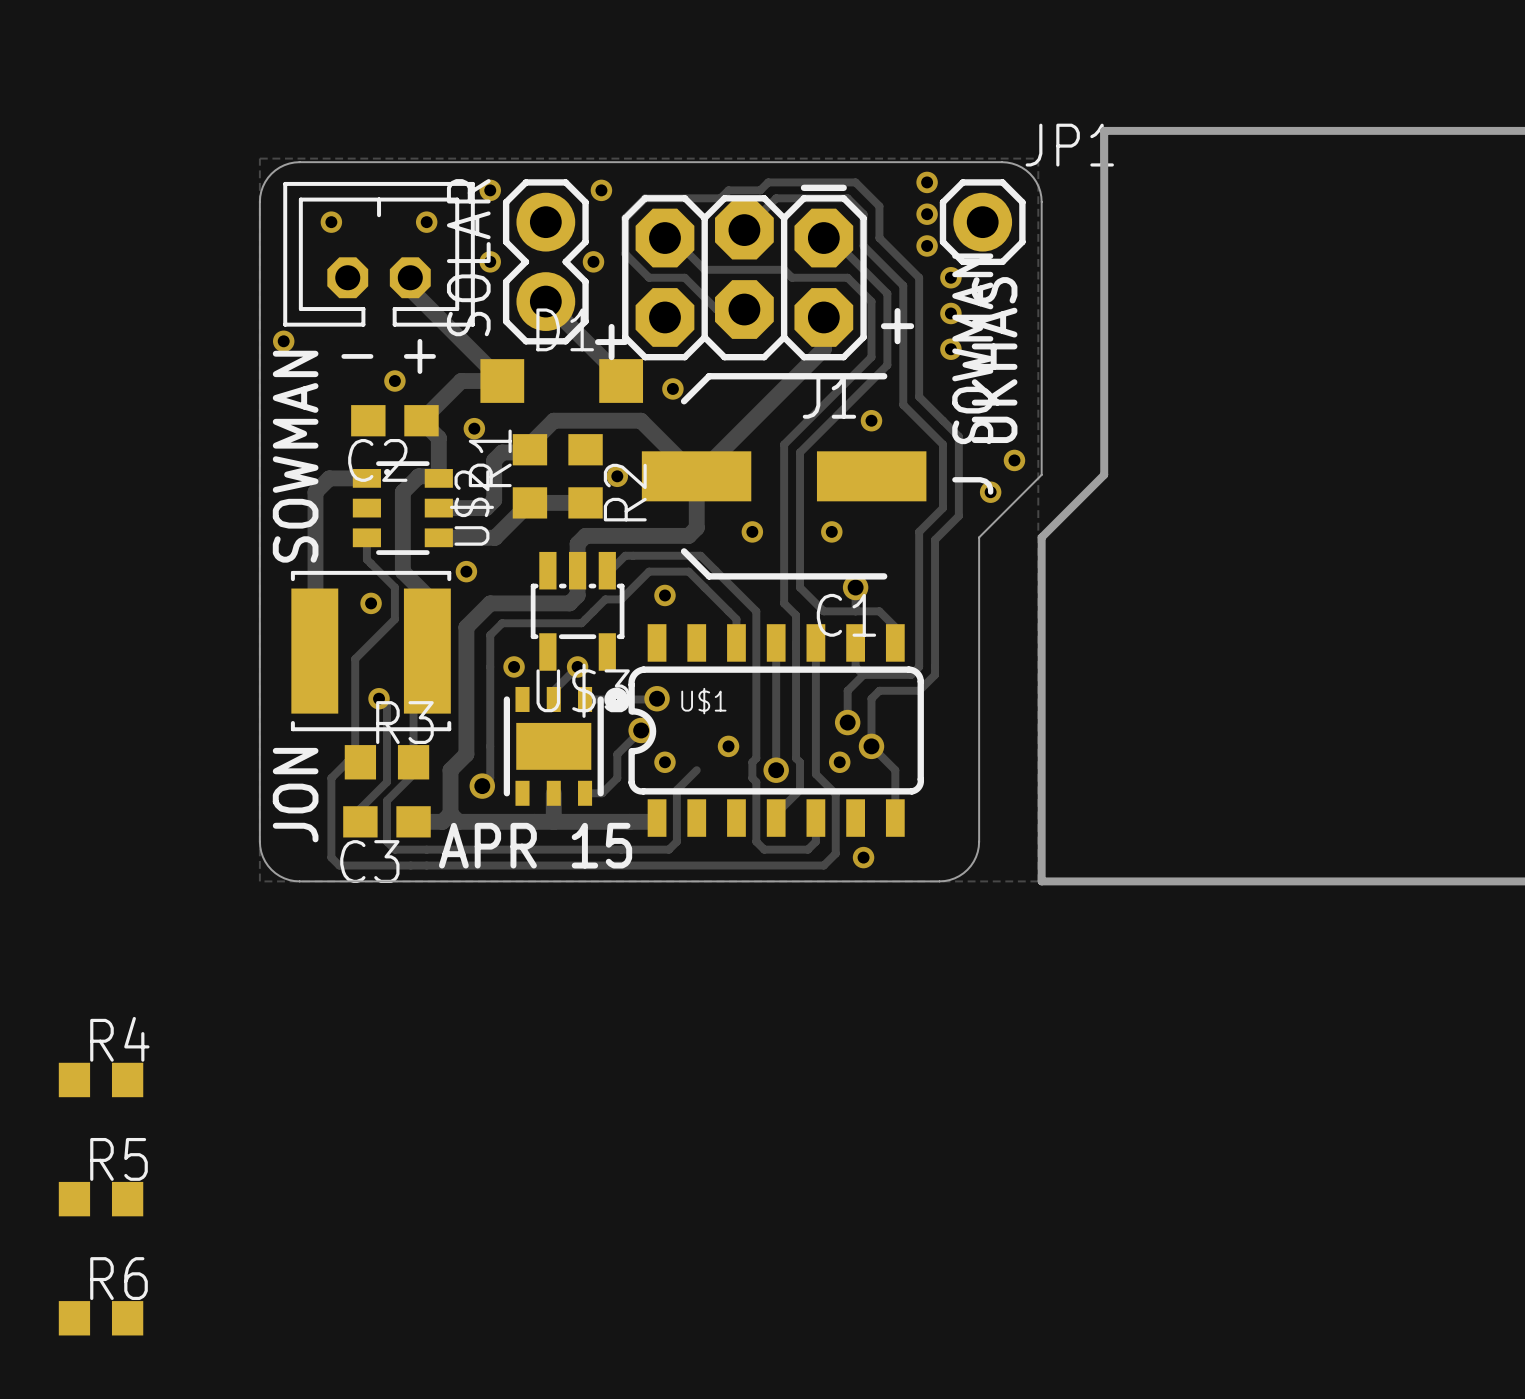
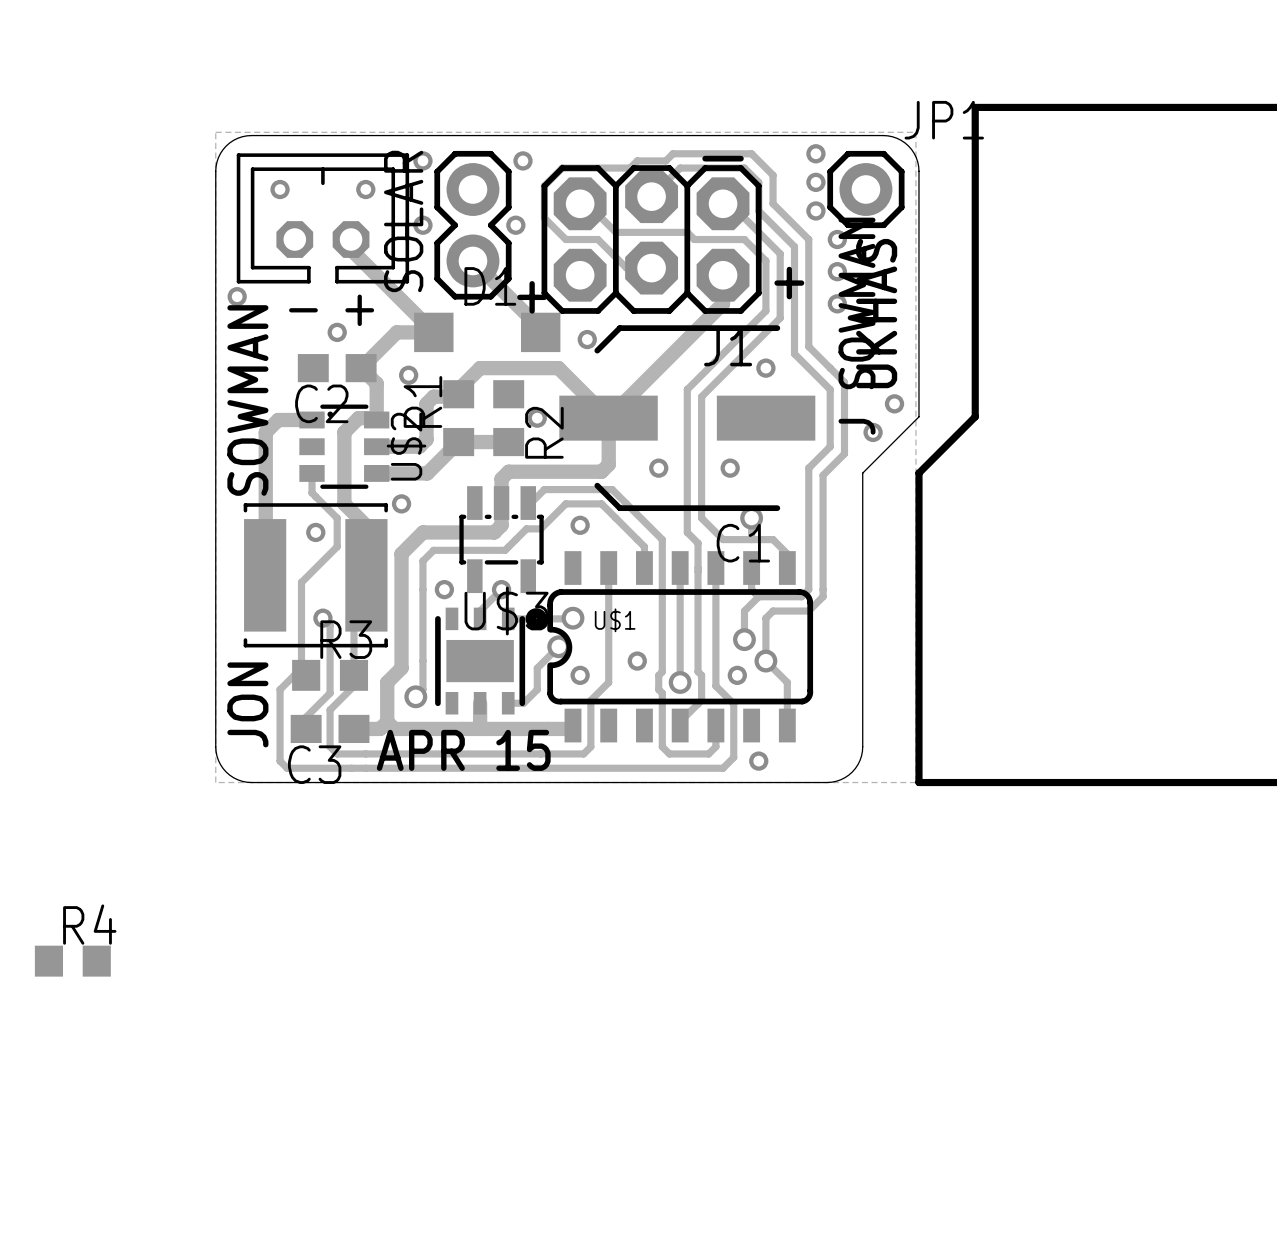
track: none -> (608, 568) (608, 682)
R5: (101, 1199) -> none
R6: (101, 1318) -> none

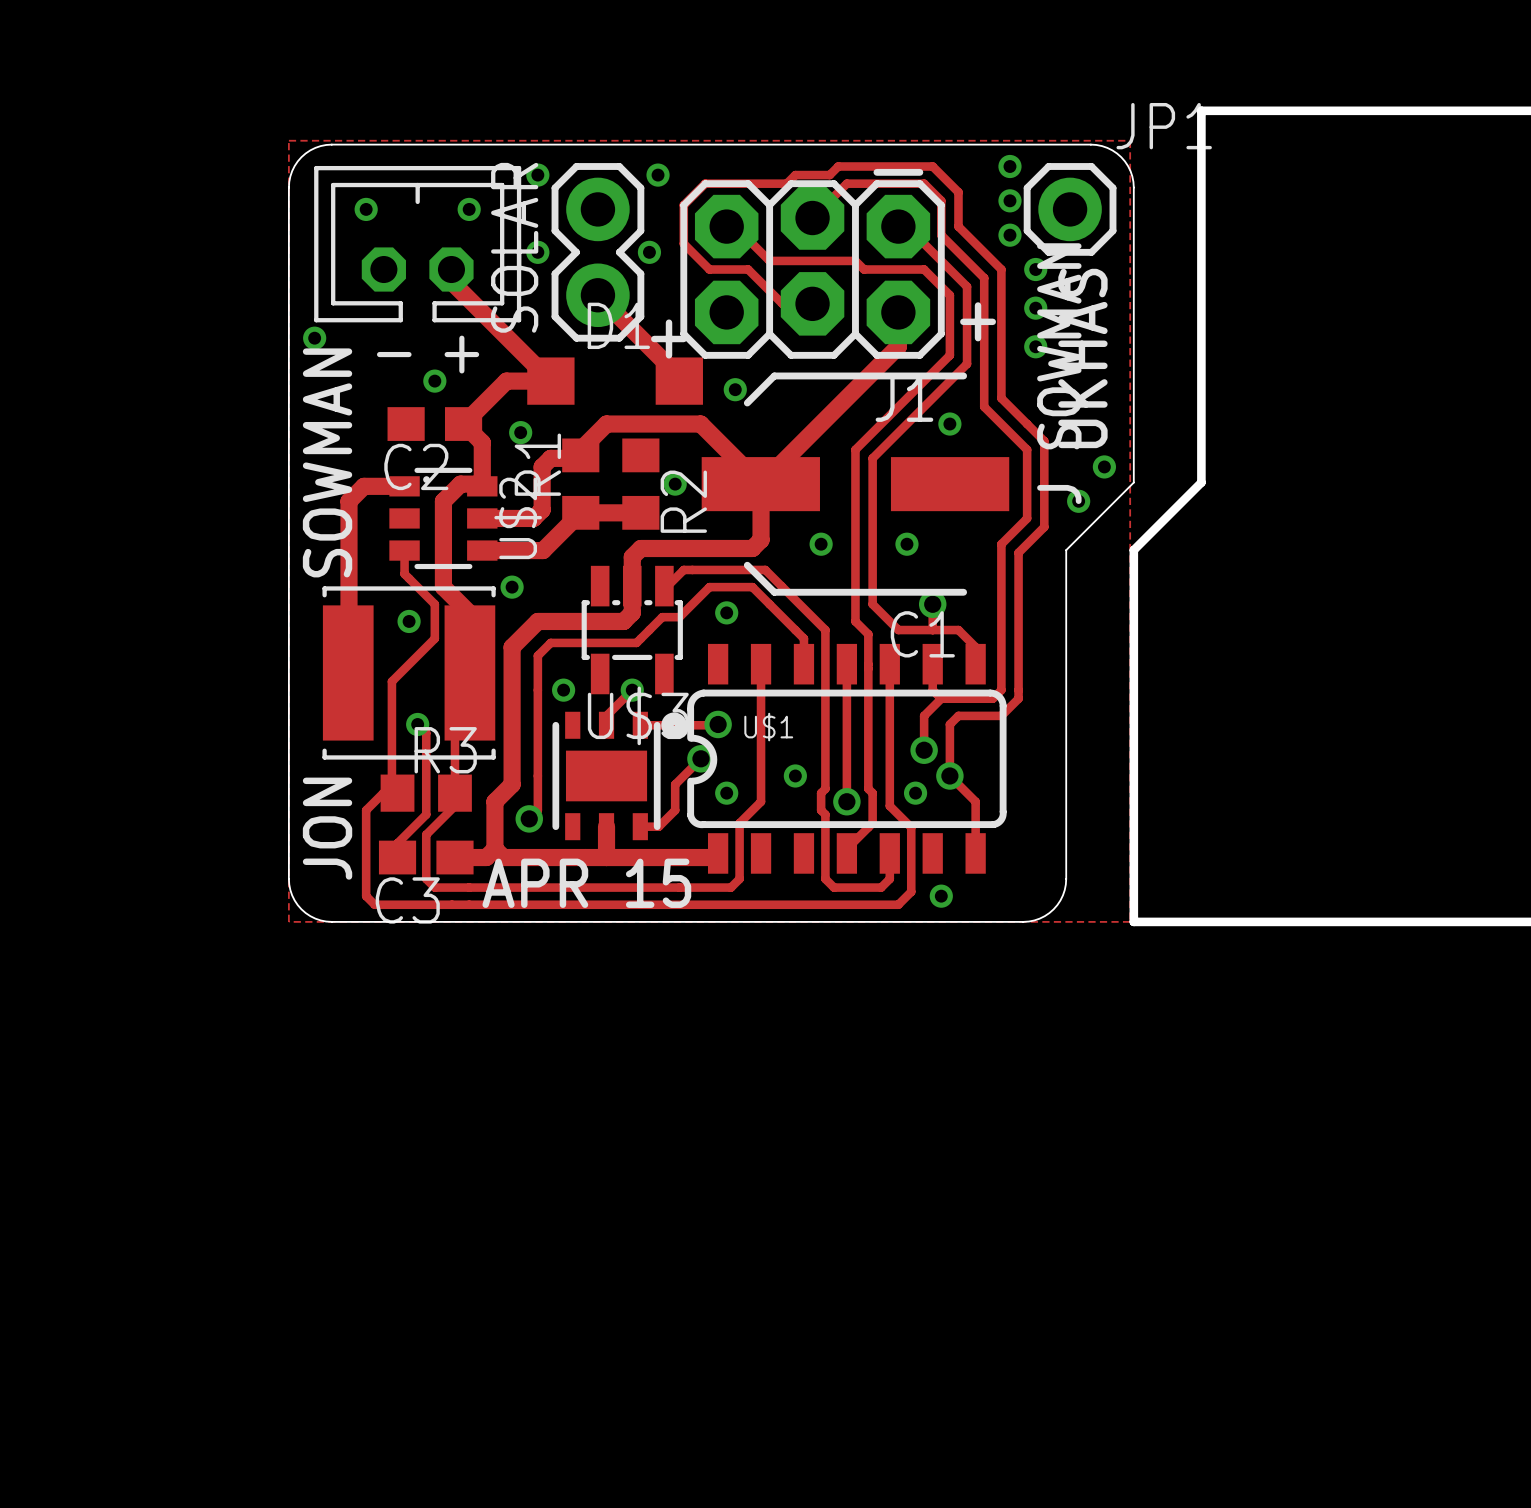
R4: (72, 961) -> none

